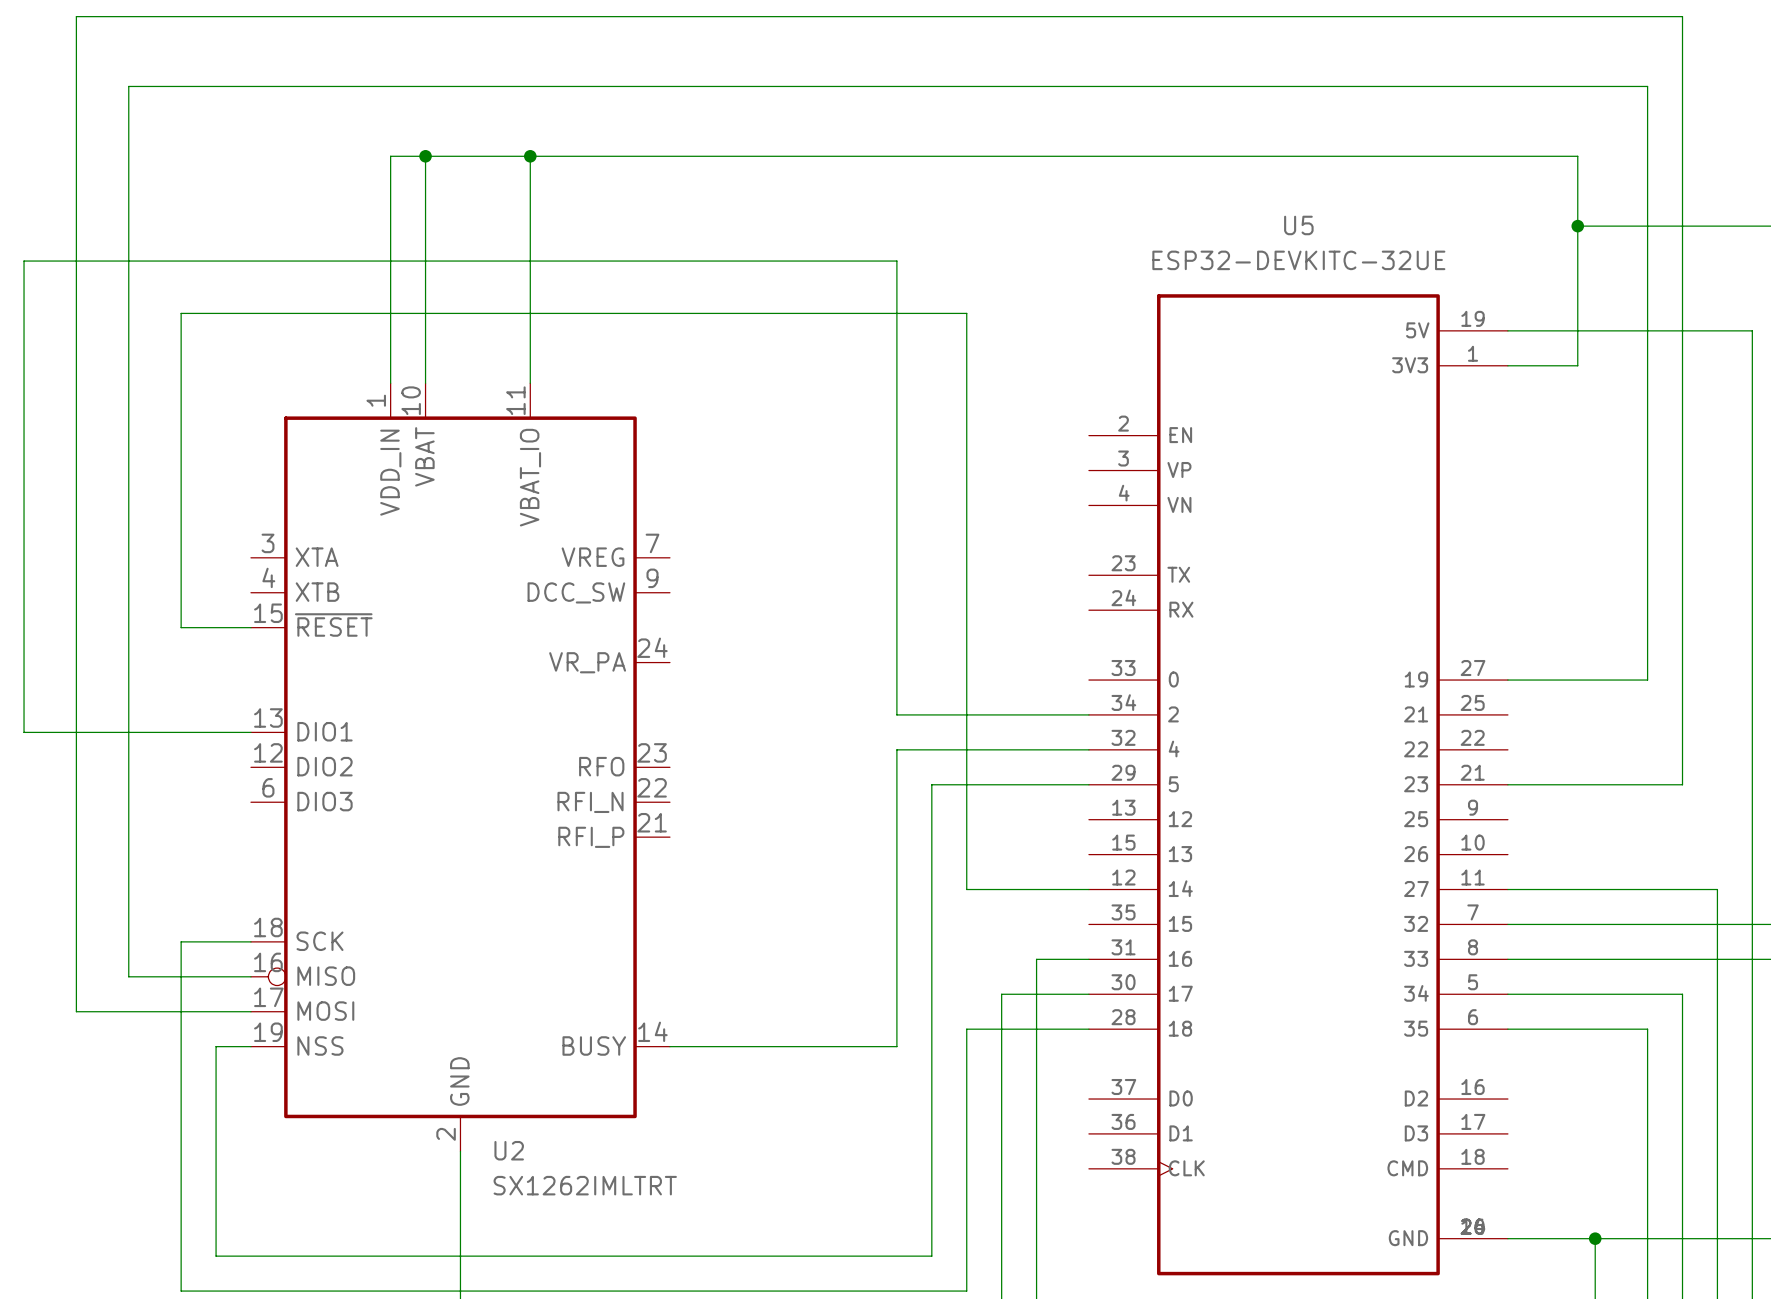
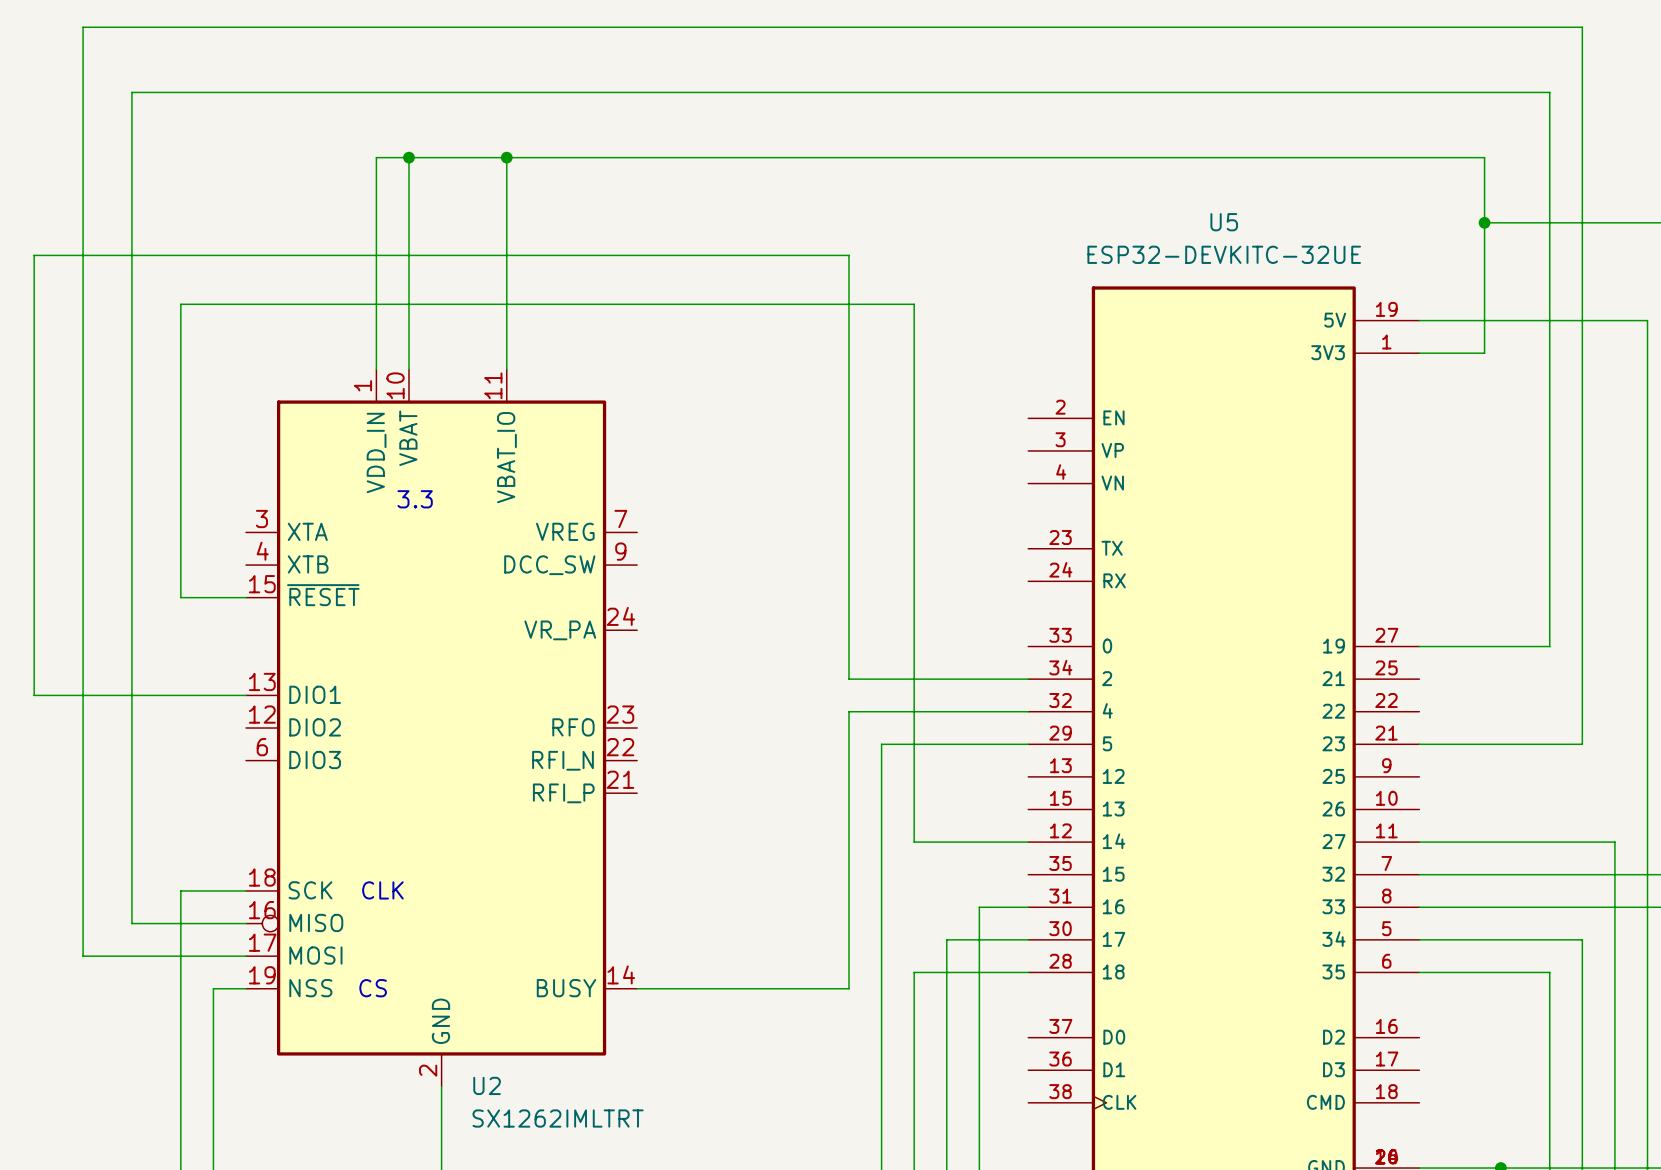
text: none -> 3.3 (415, 499)
text: none -> CLK (382, 890)
text: none -> CS (373, 988)

